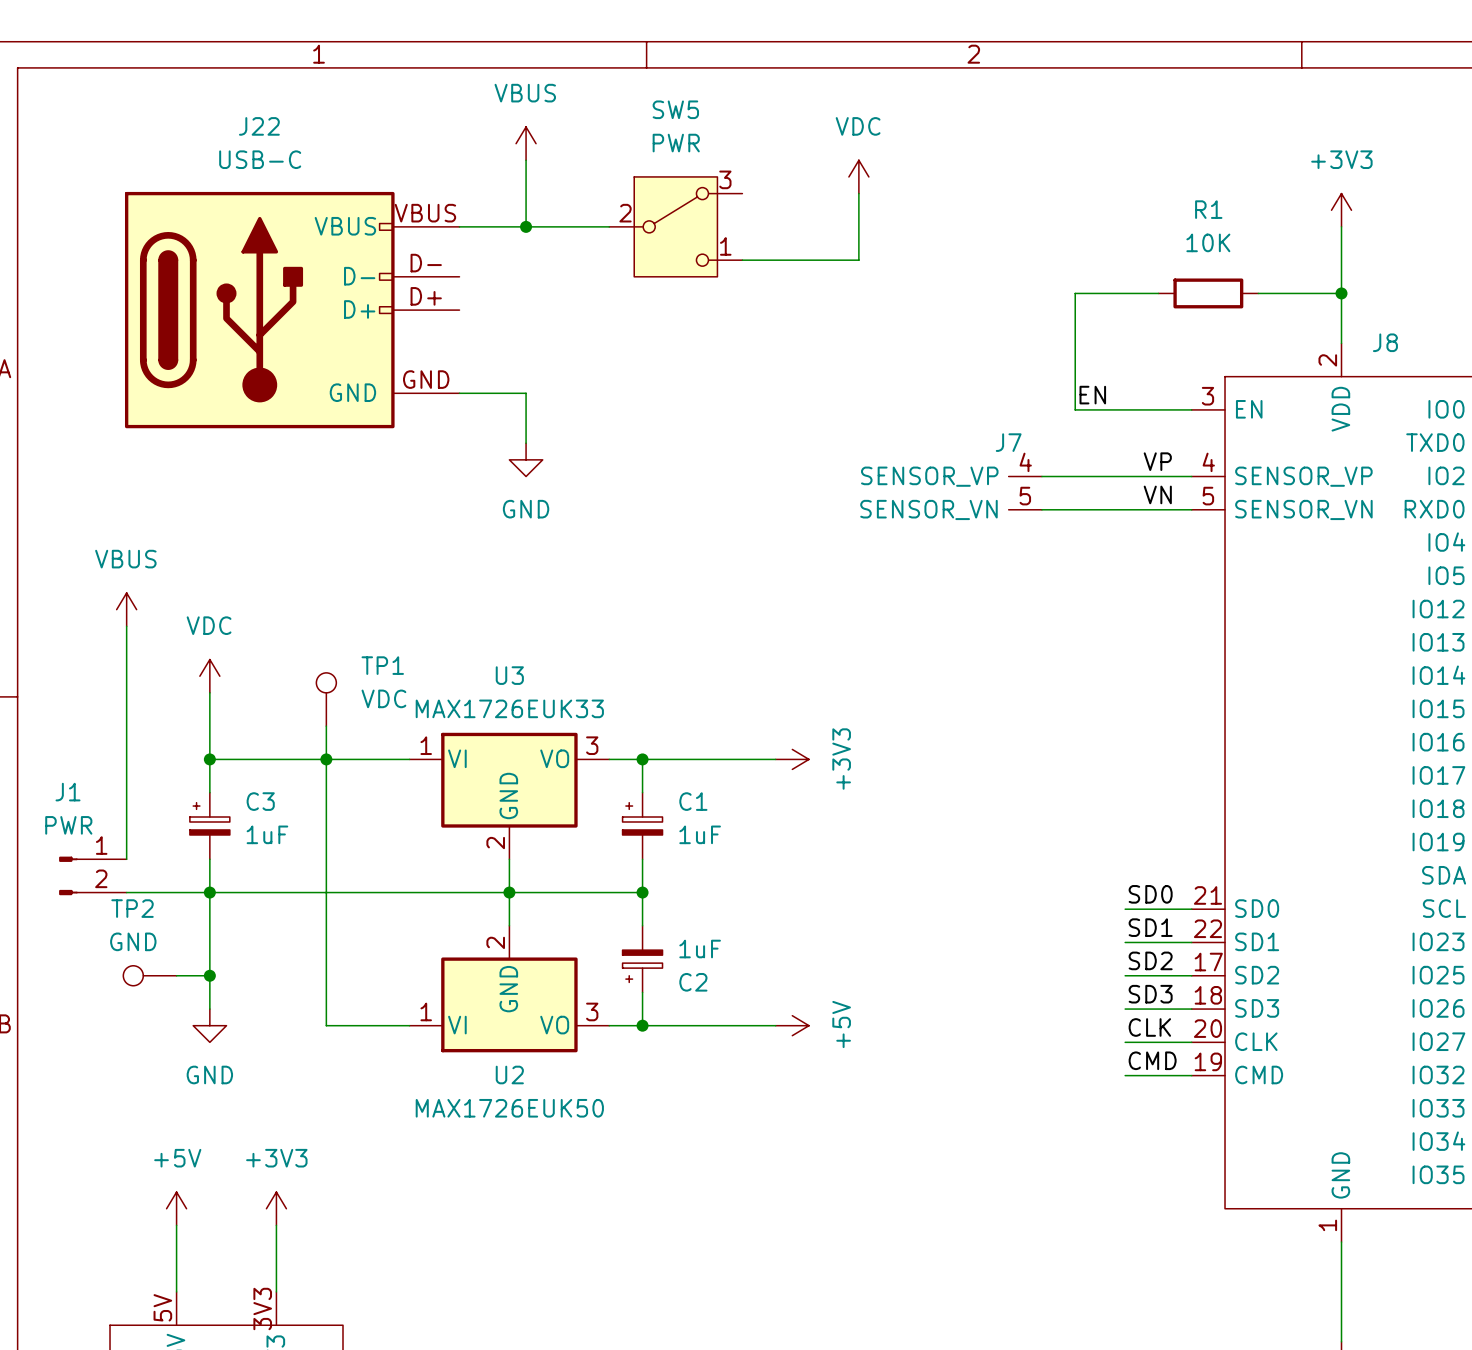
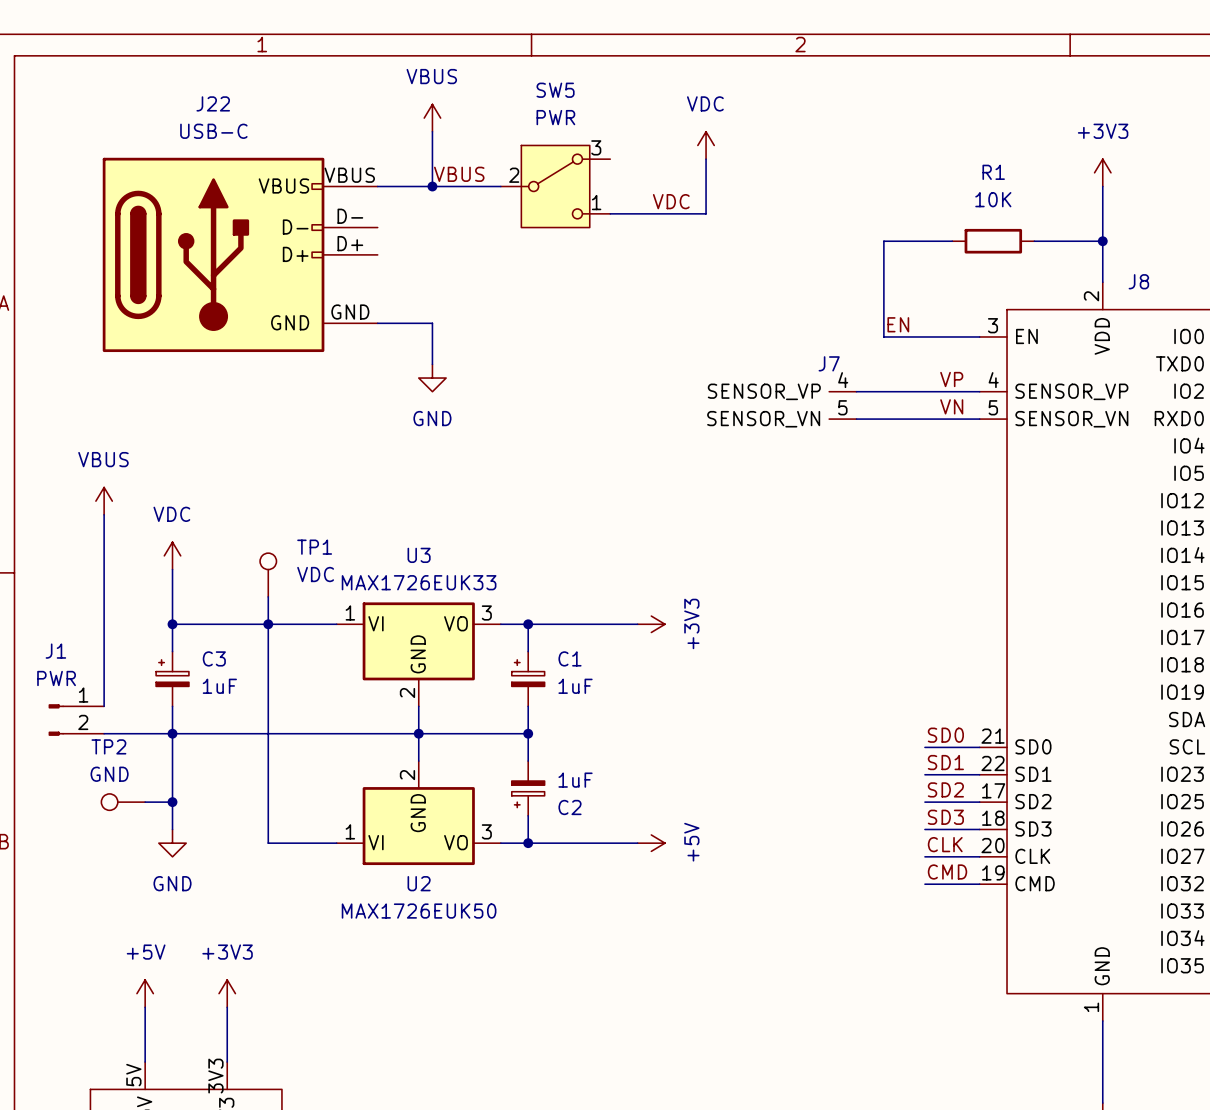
label: none -> VBUS (459, 174)
label: none -> VDC (671, 201)

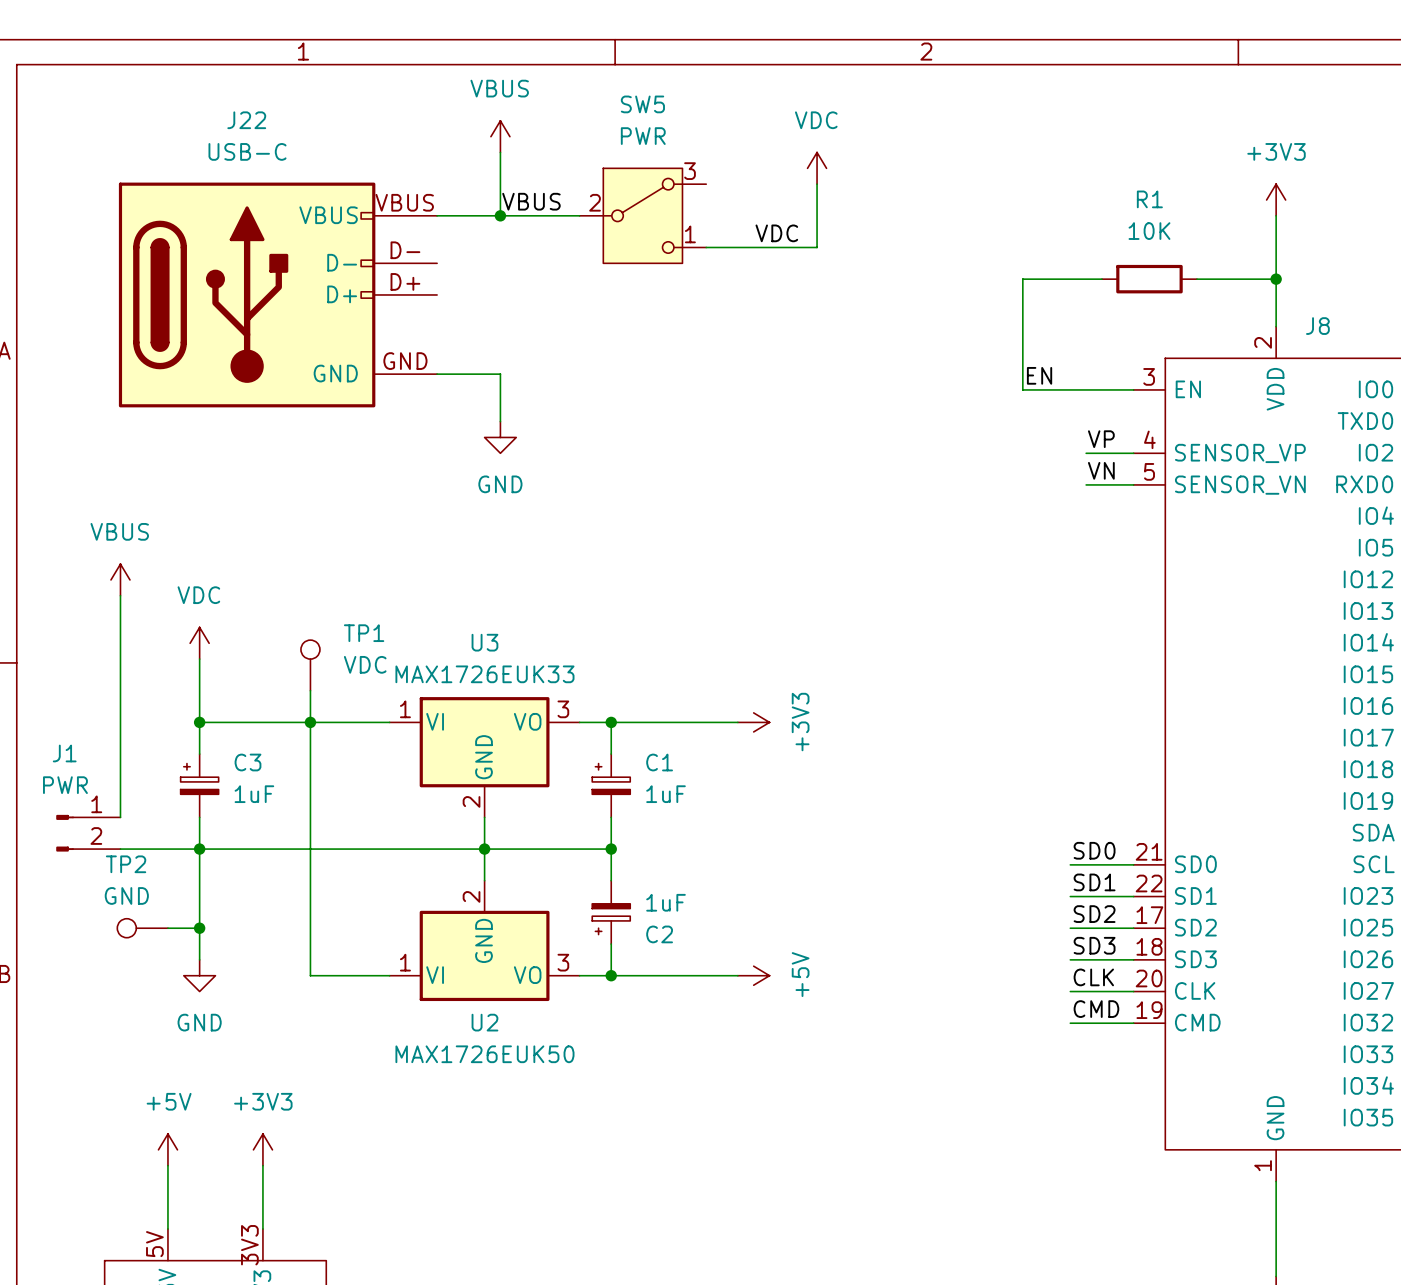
wire: (856, 391) (938, 391) -> none
J7: (842, 405) -> none
wire: (856, 419) (938, 419) -> none

